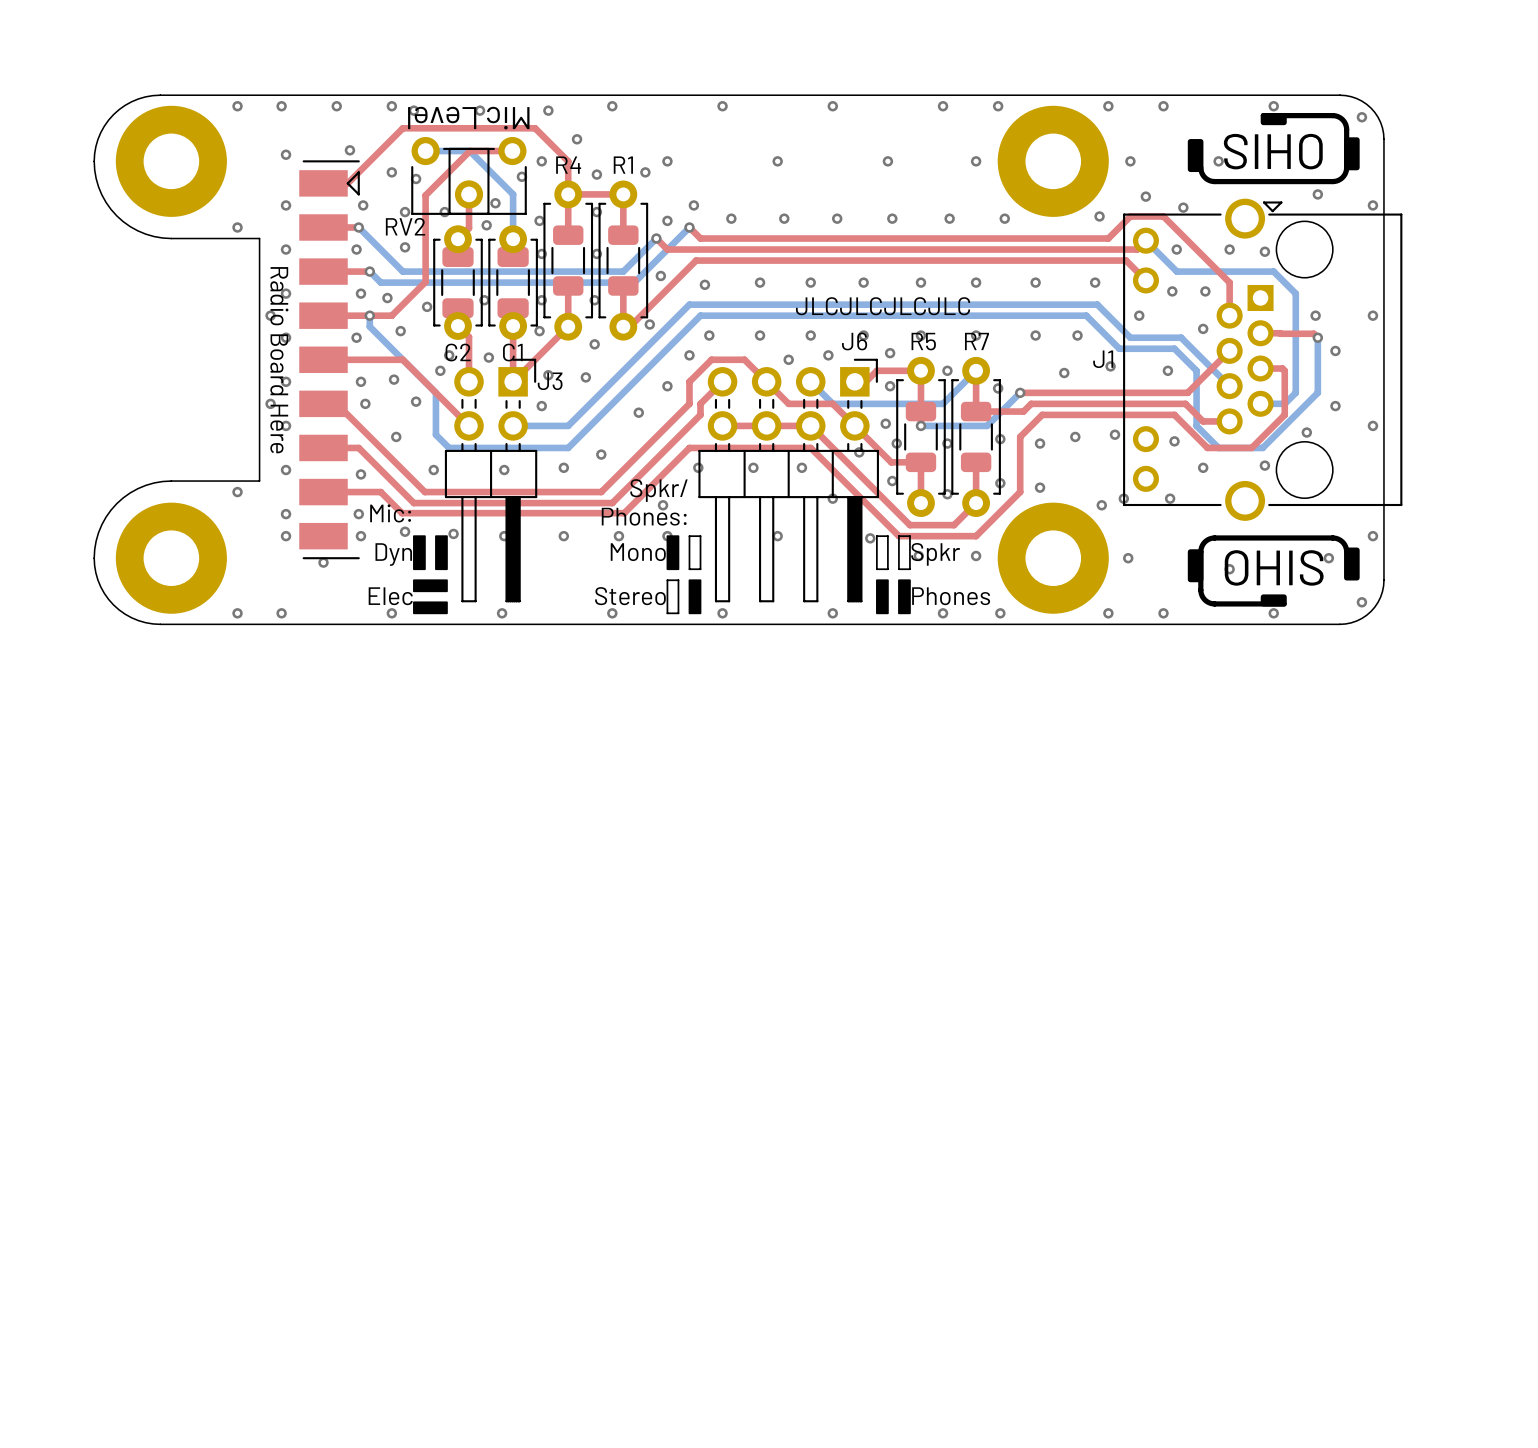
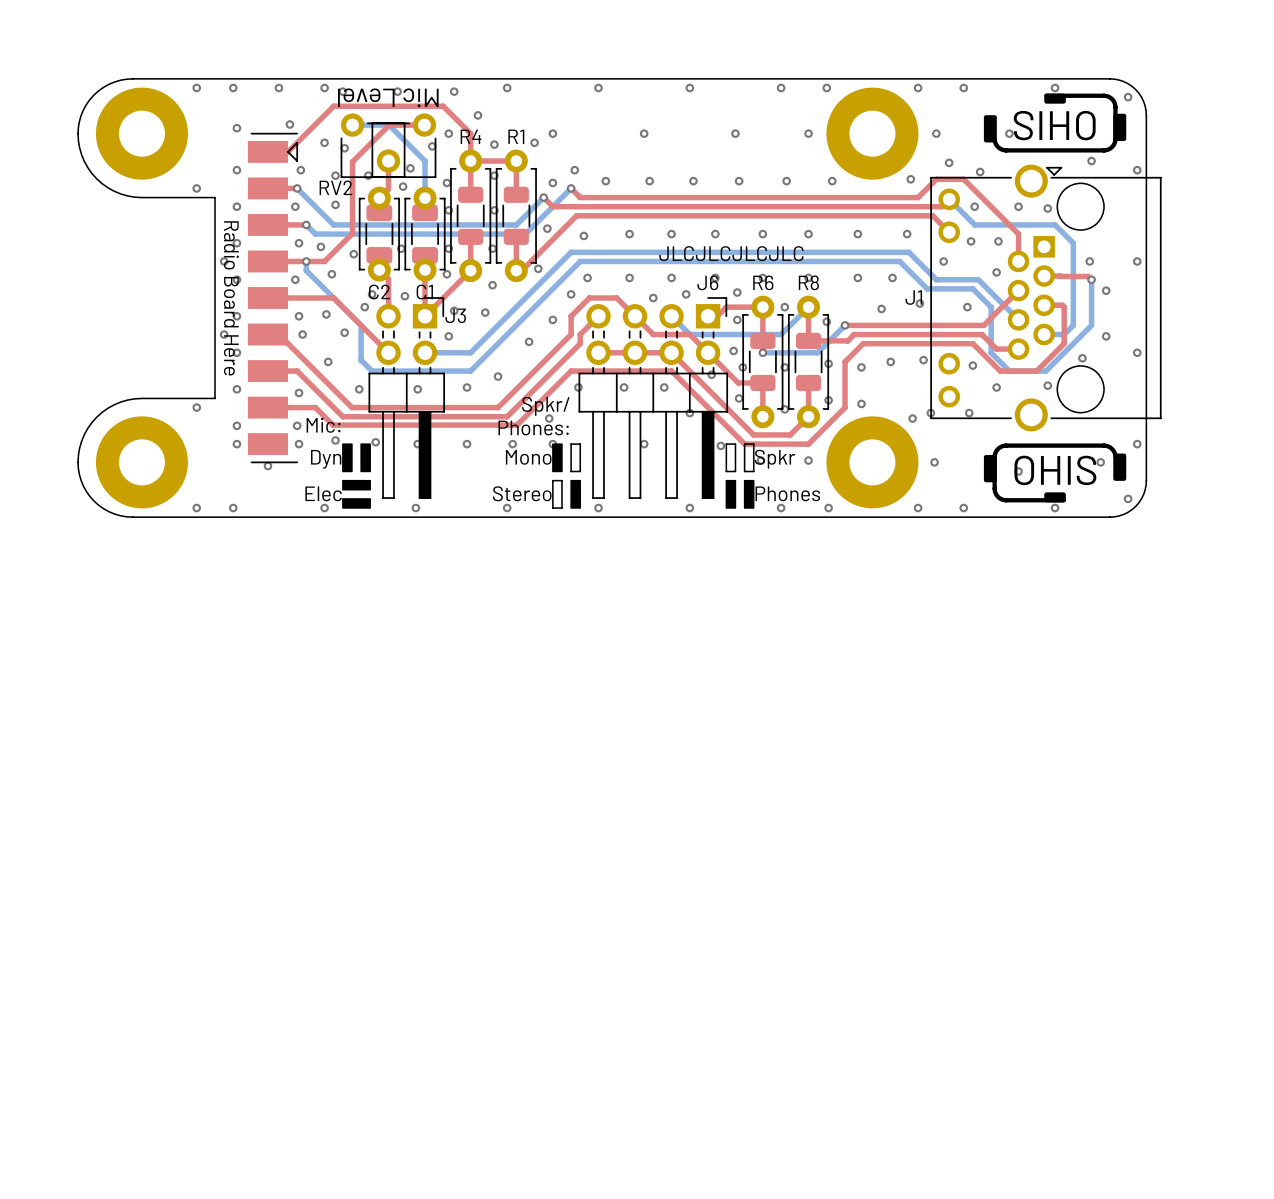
R6 name: none -> R6 (763, 282)
R5 name: R5 (923, 341) -> none
R7 name: R7 (976, 341) -> none
R8 name: none -> R8 (808, 282)

